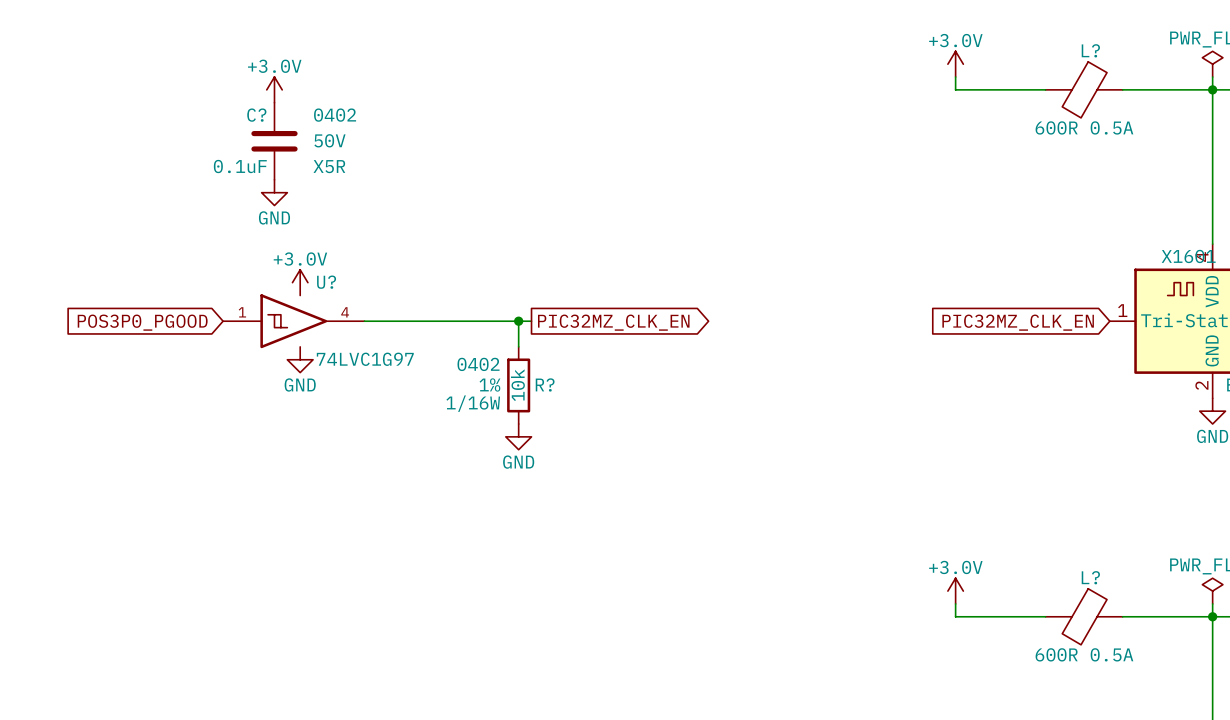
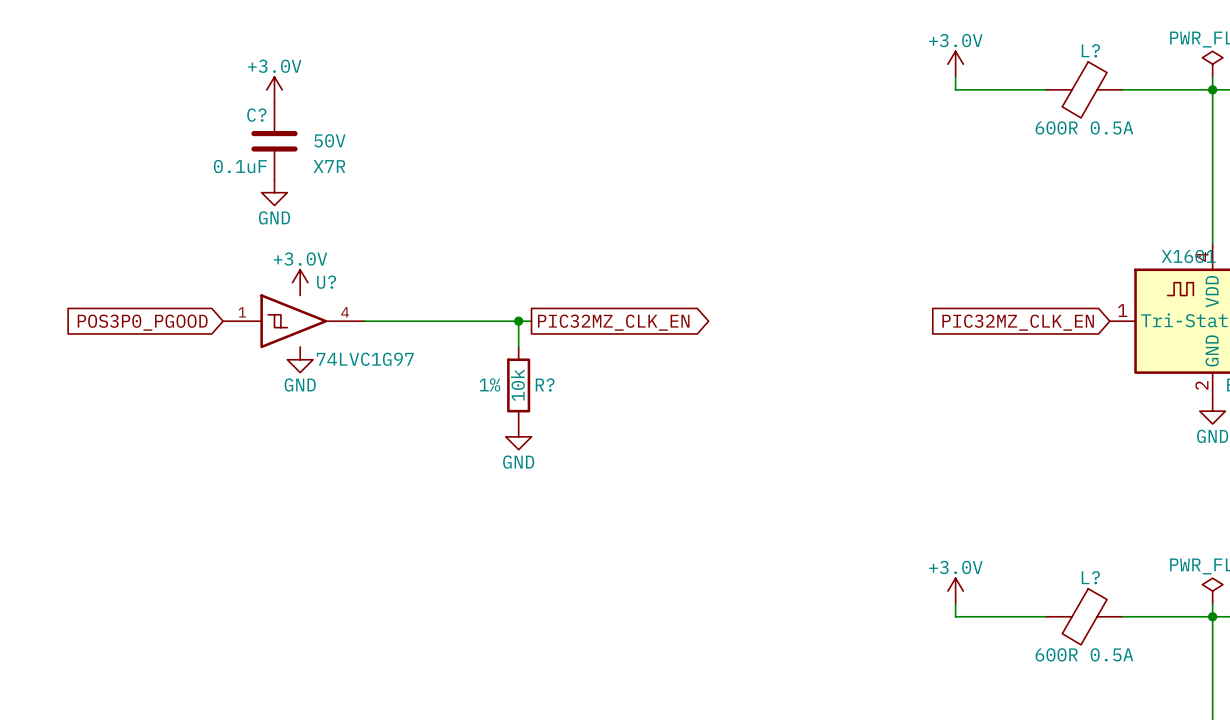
C? text: 0402 (335, 115) -> none
C? text: X5R (329, 166) -> X7R (329, 166)
R? text: 0402 (478, 364) -> none
R? text: 1/16W (473, 403) -> none

